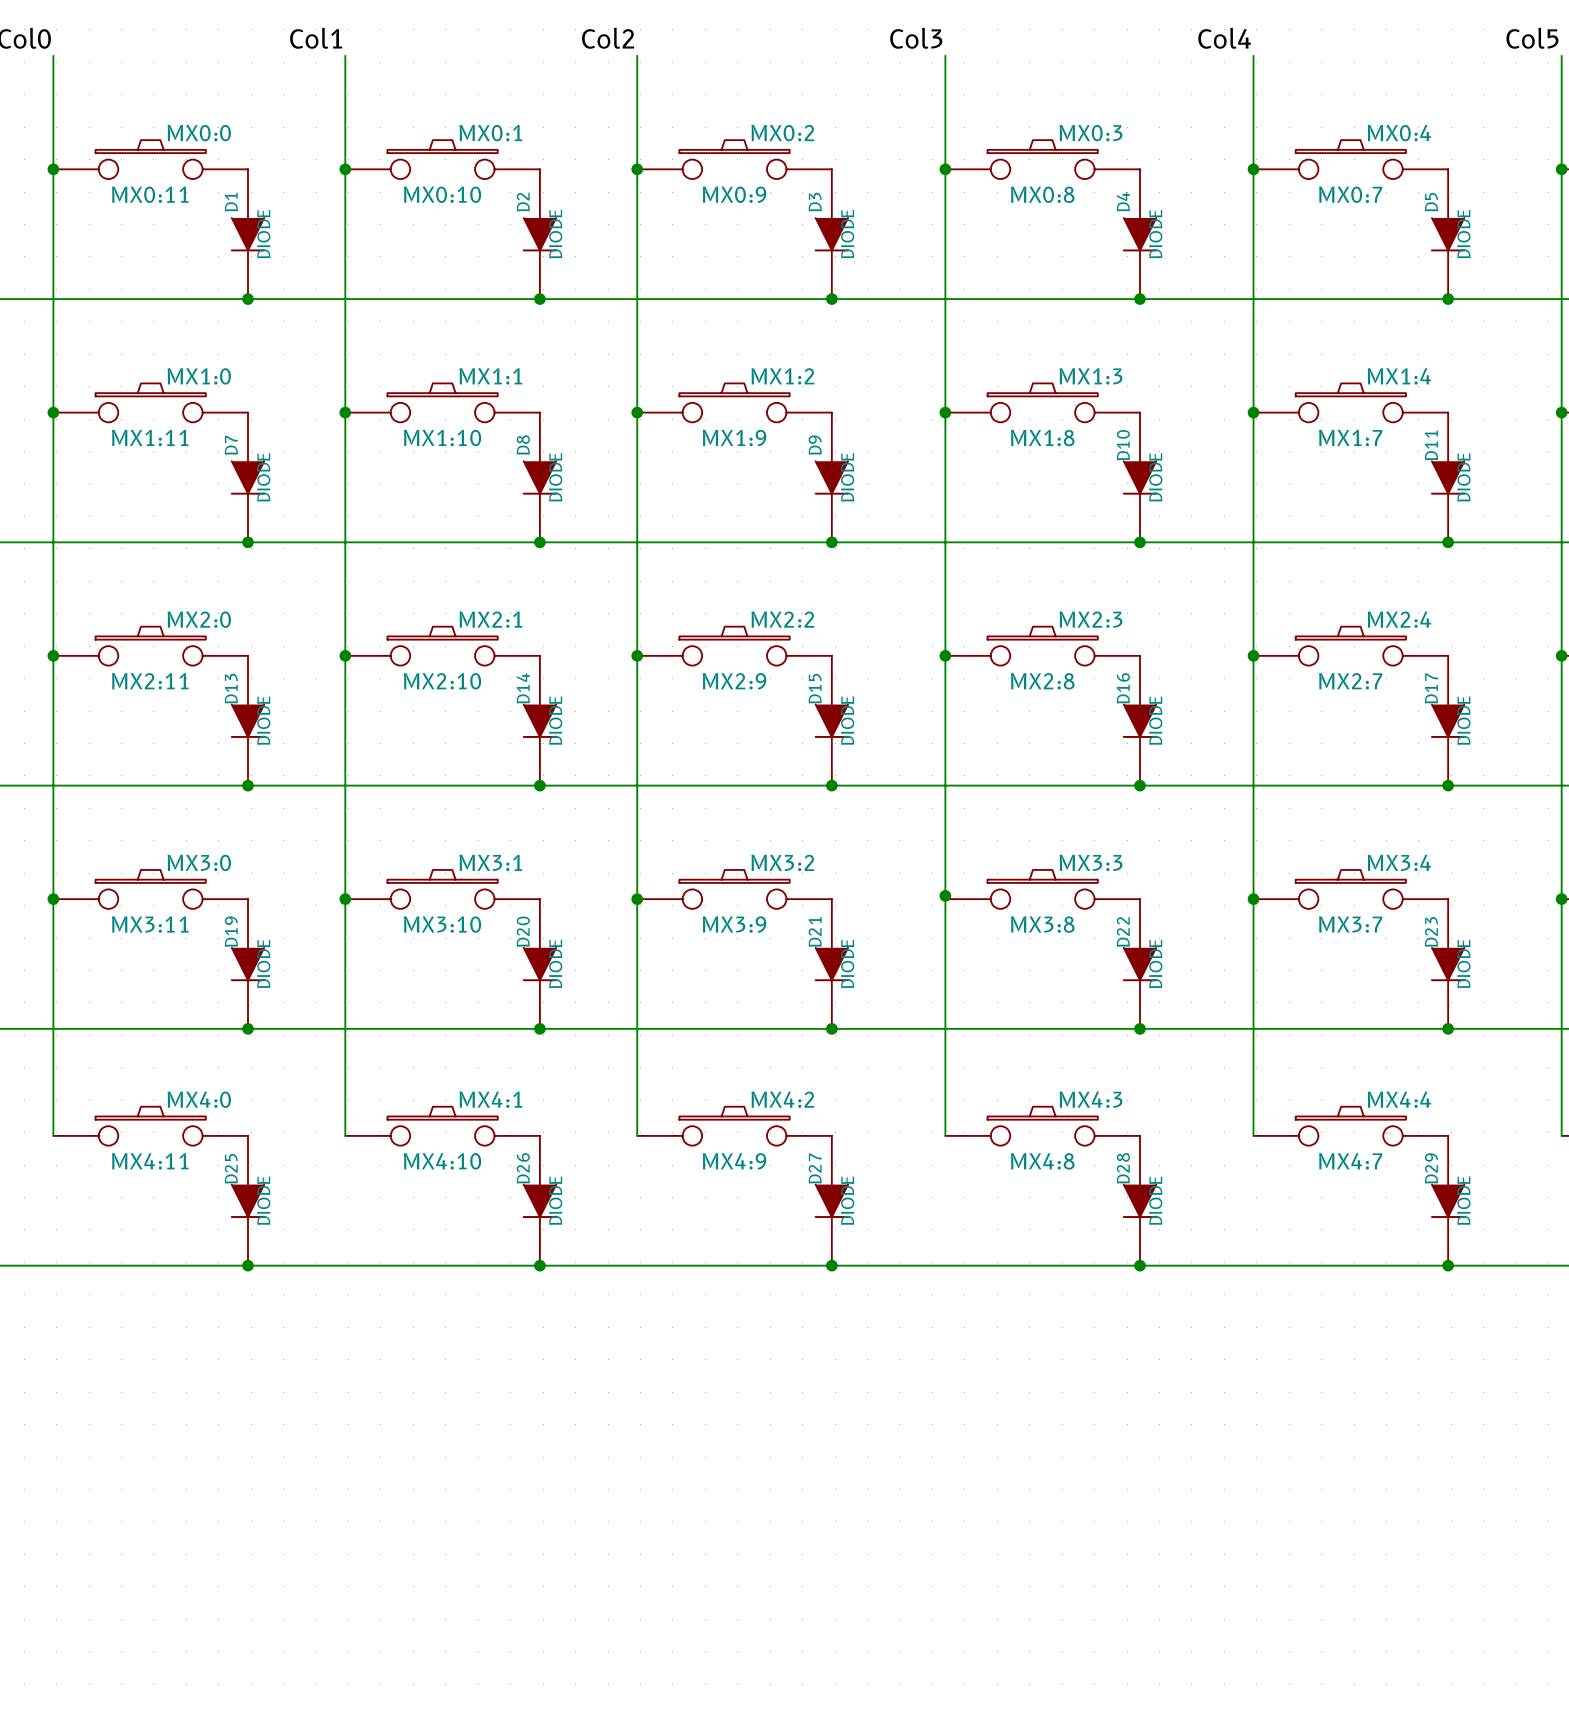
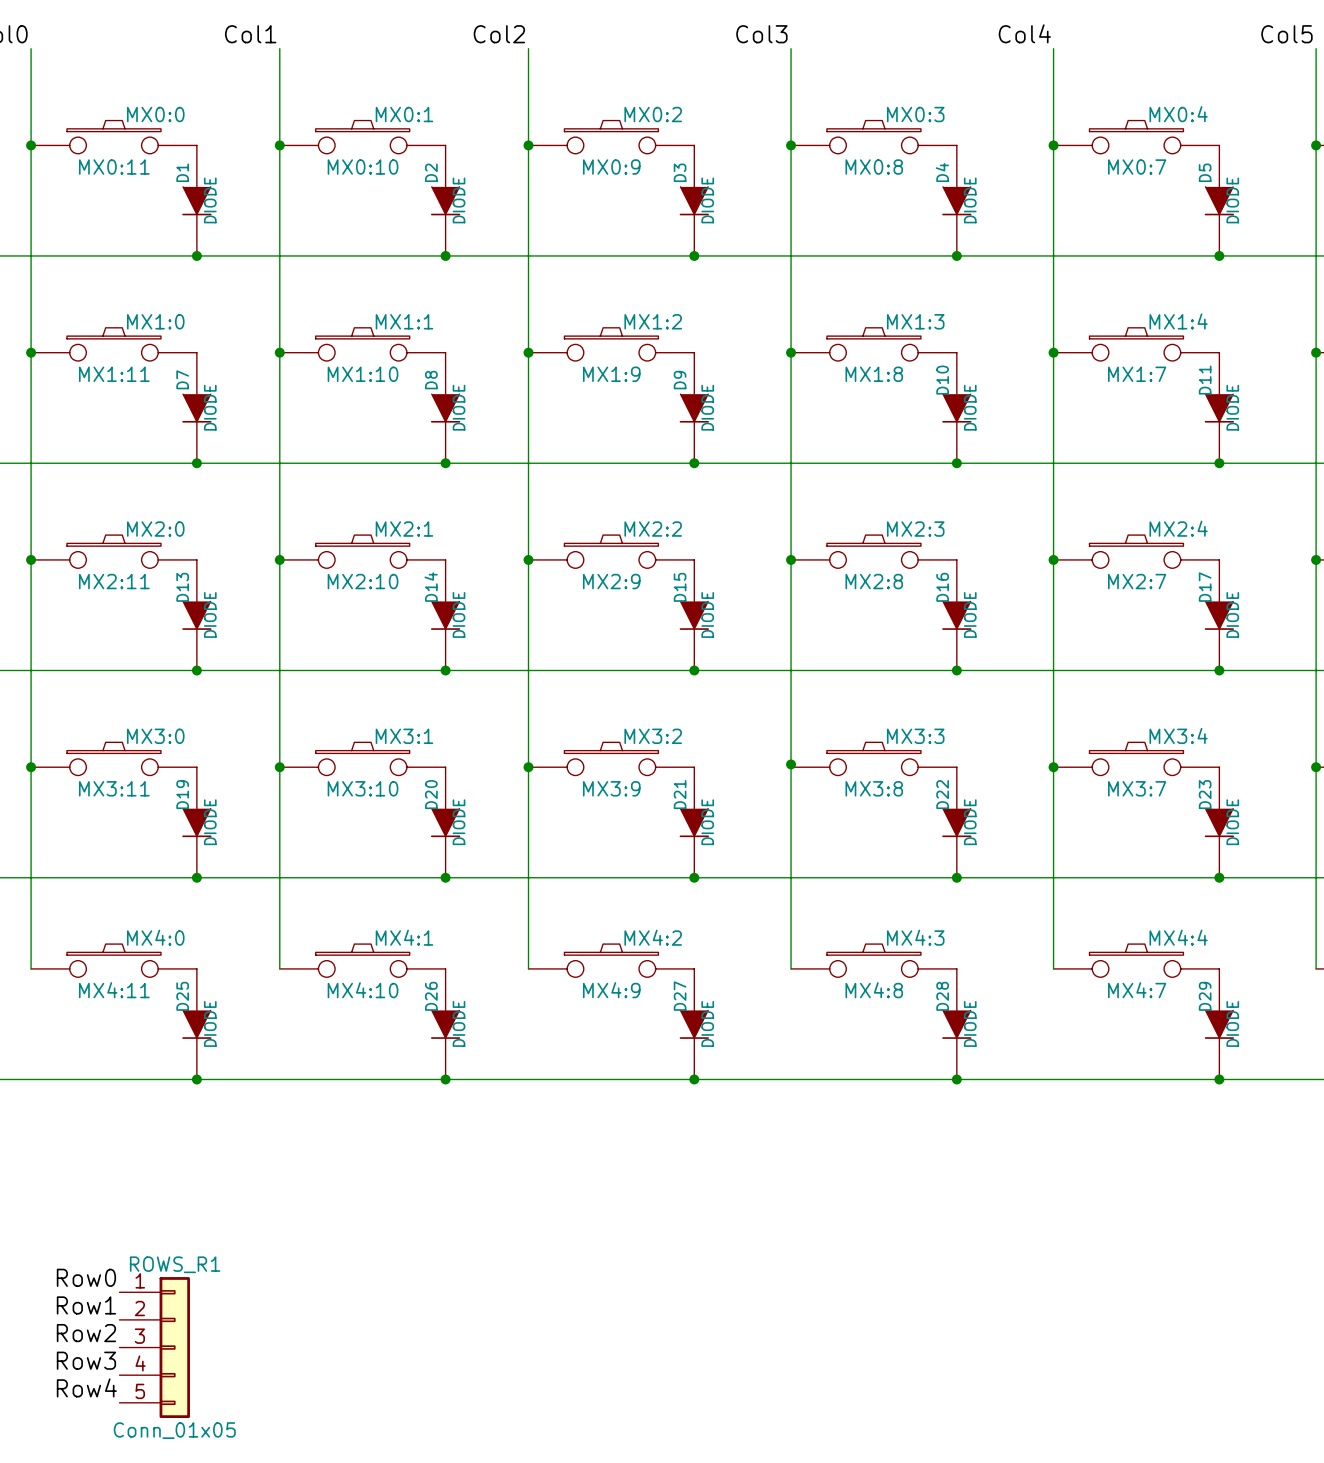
label: none -> Row0 (86, 1277)
label: none -> Row1 (86, 1305)
label: none -> Row2 (86, 1333)
ROWS_R1: none -> Conn_01x05 (154, 1347)
label: none -> Row3 (86, 1360)
label: none -> Row4 (86, 1387)

